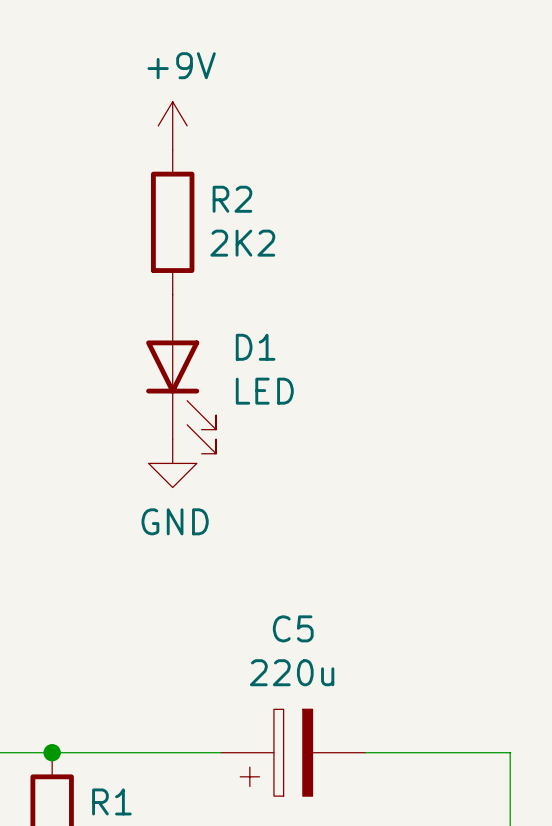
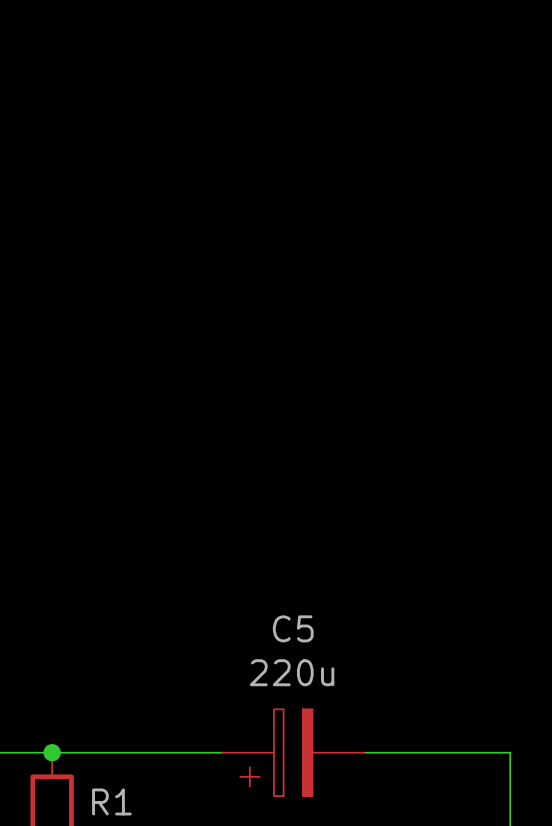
power symbol: +9V (172, 125) -> none
R2: 2K2 (172, 222) -> none
D1: LED (181, 374) -> none
power symbol: GND (172, 463) -> none

